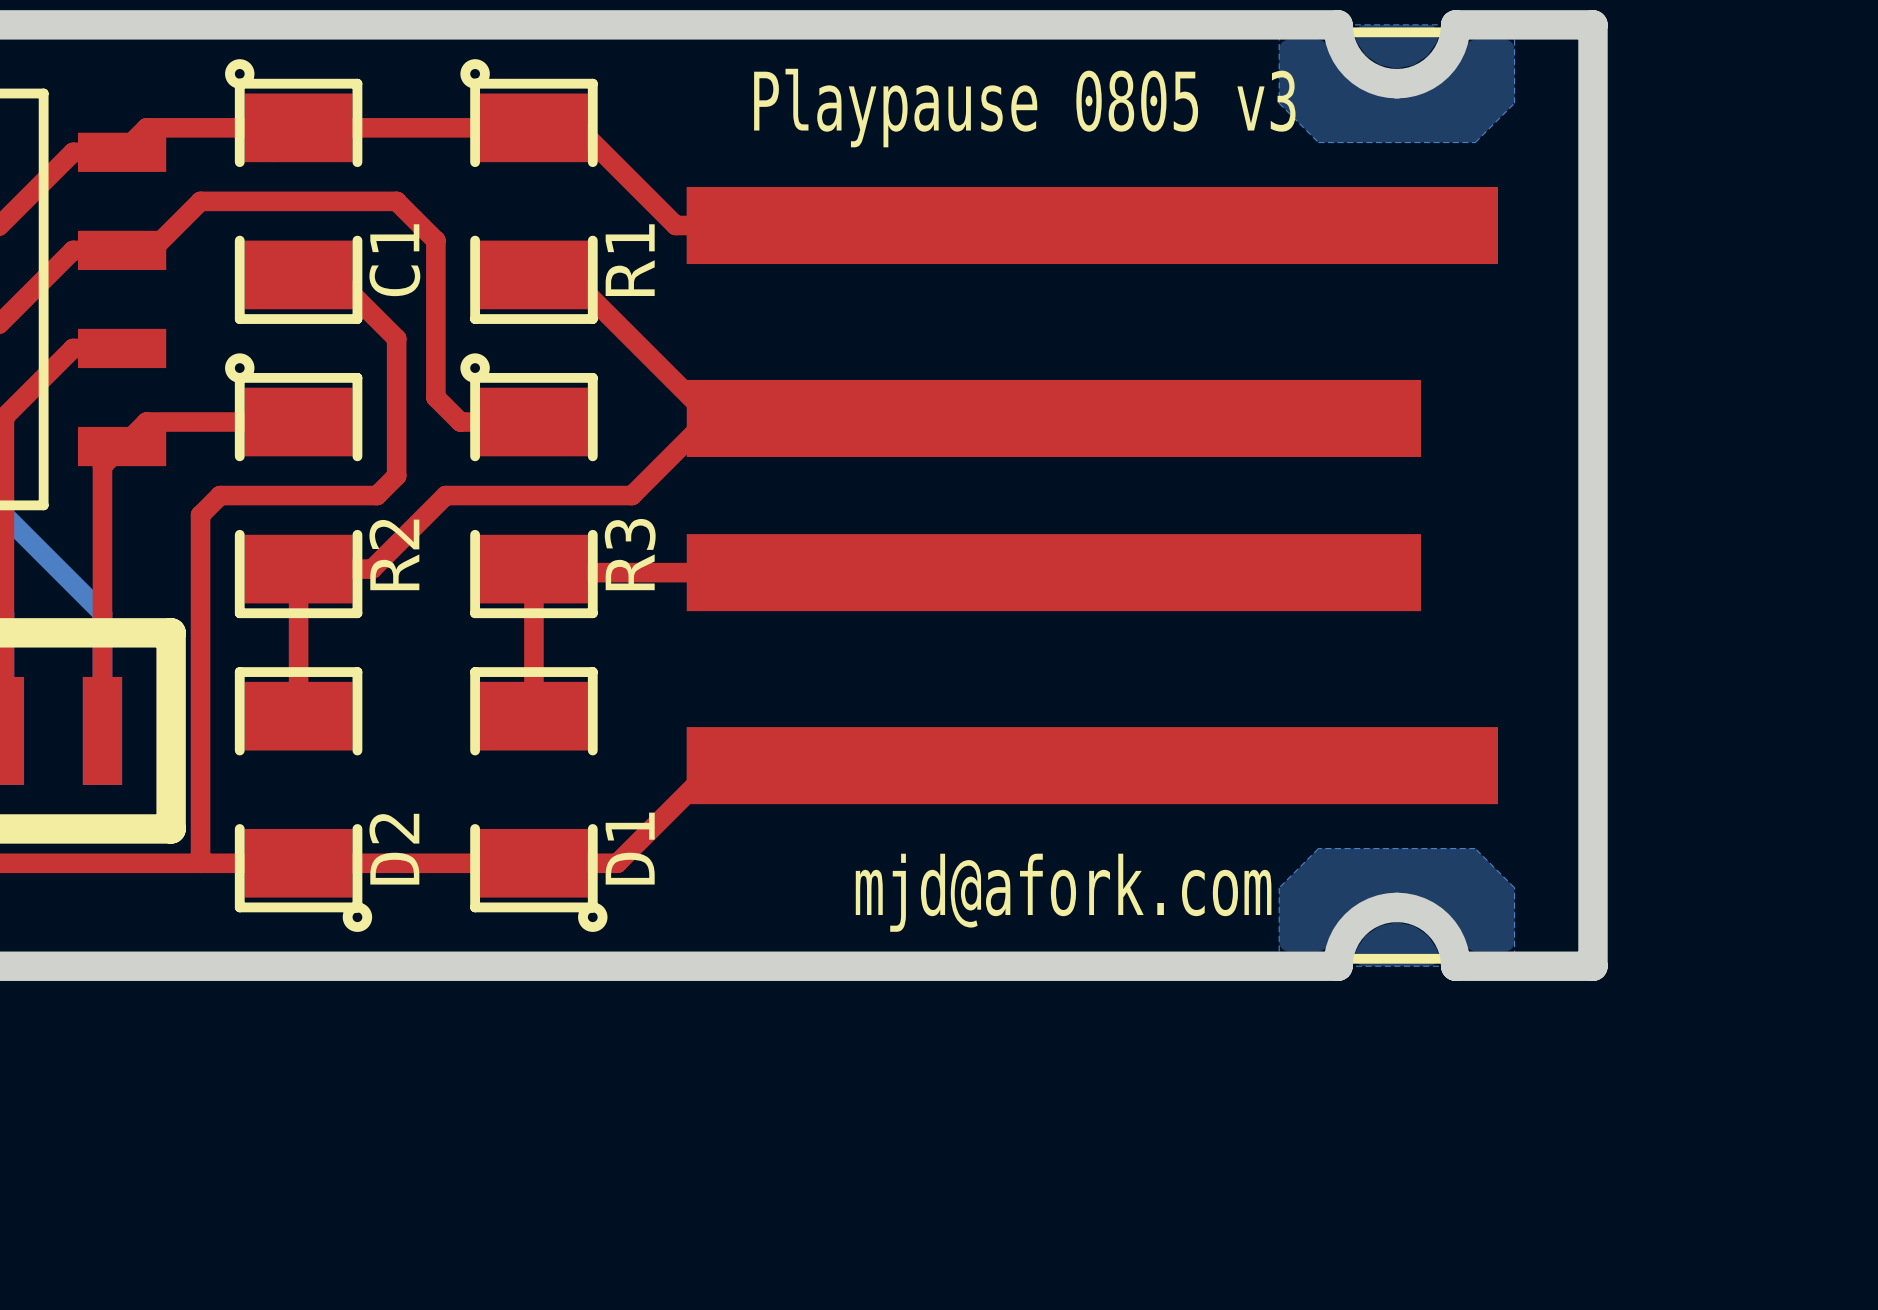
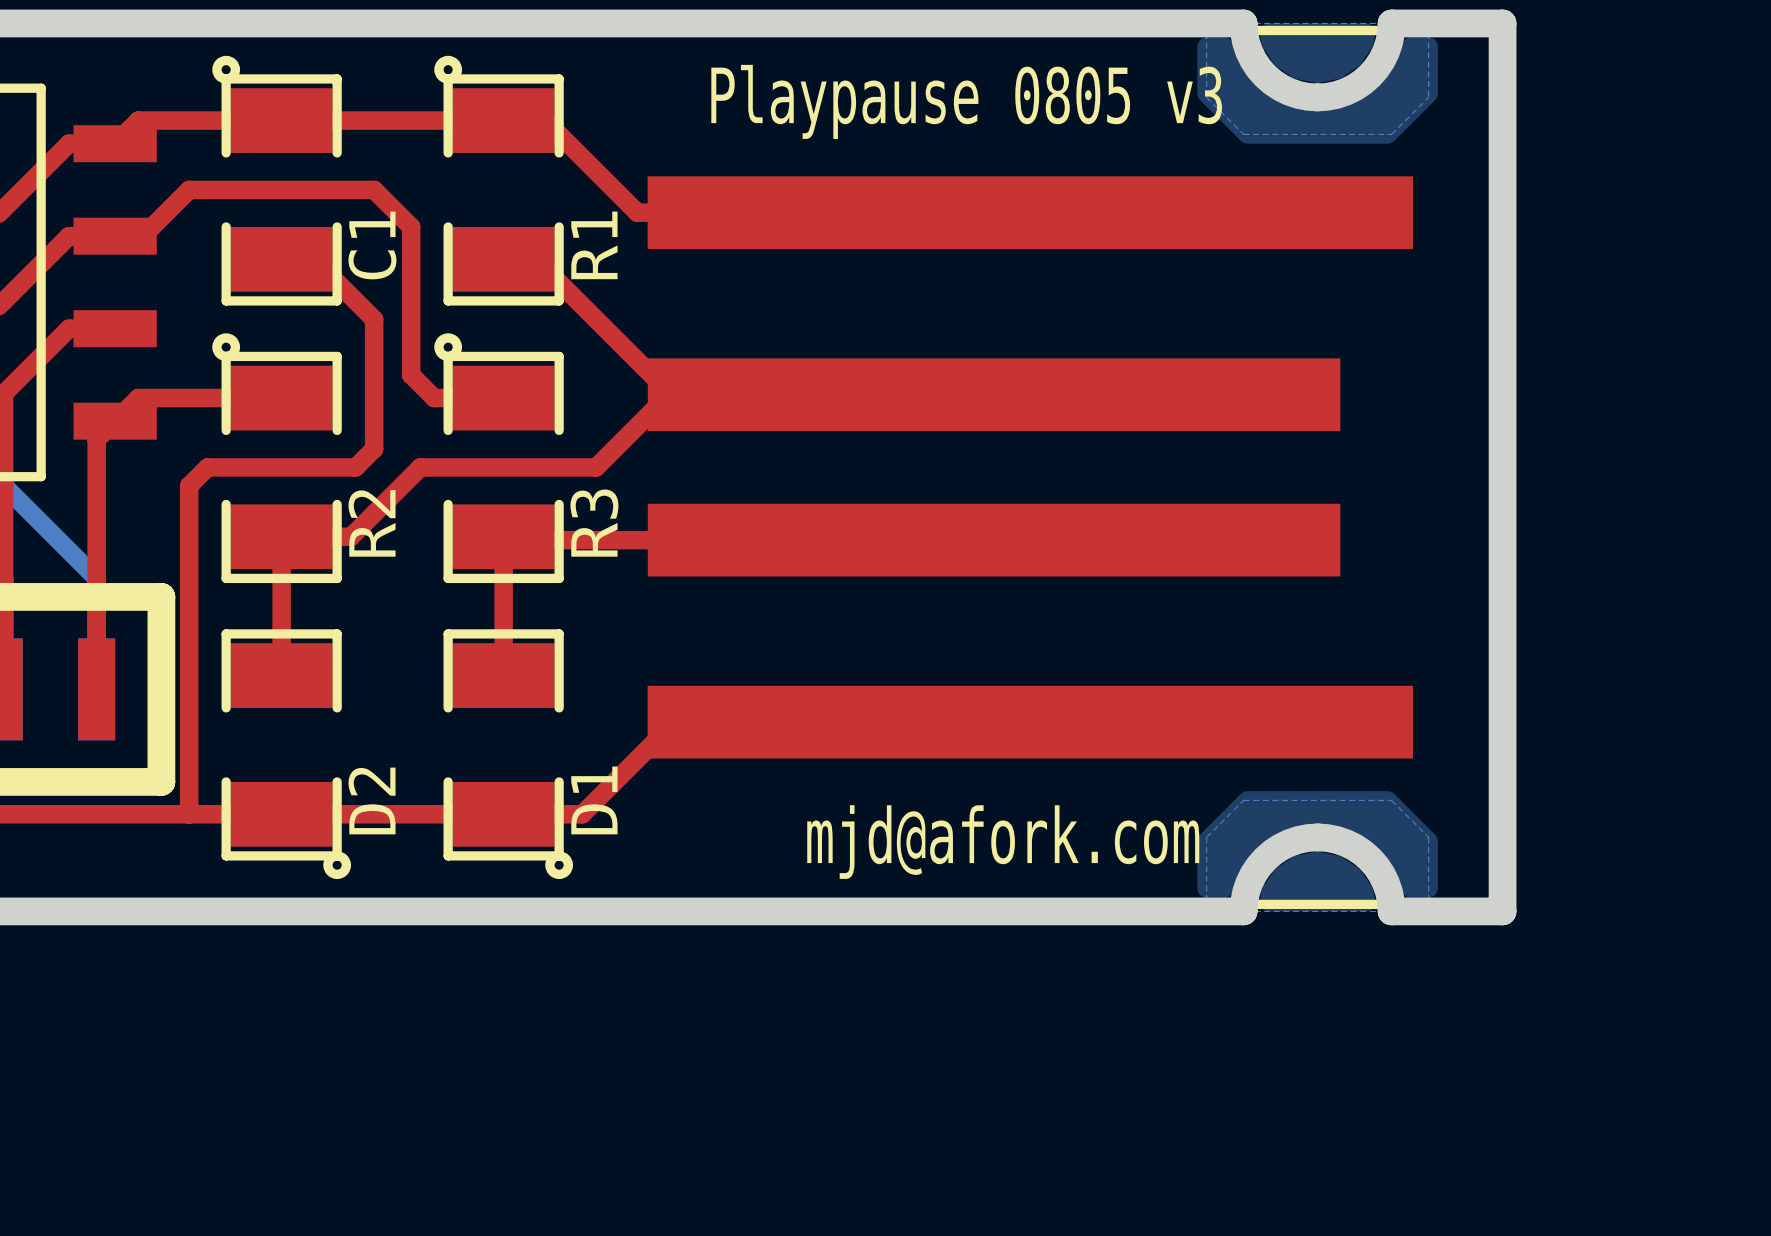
board edge: (1318, 24) (1338, 24) (1342, 47) (1355, 66) (1374, 79) (1396, 83) (1419, 79) (1438, 66) (1451, 47) (1455, 24) (1475, 24) -> (1243, 23) (1249, 51) (1265, 75) (1289, 91) (1317, 97) (1345, 91) (1369, 75) (1385, 51) (1391, 23)
board edge: (1318, 966) (1338, 966) (1342, 943) (1355, 924) (1374, 911) (1396, 907) (1419, 911) (1438, 924) (1451, 943) (1455, 966) (1475, 966) -> (1243, 911) (1249, 883) (1265, 859) (1289, 843) (1317, 837) (1345, 843) (1369, 859) (1385, 883) (1391, 911)

